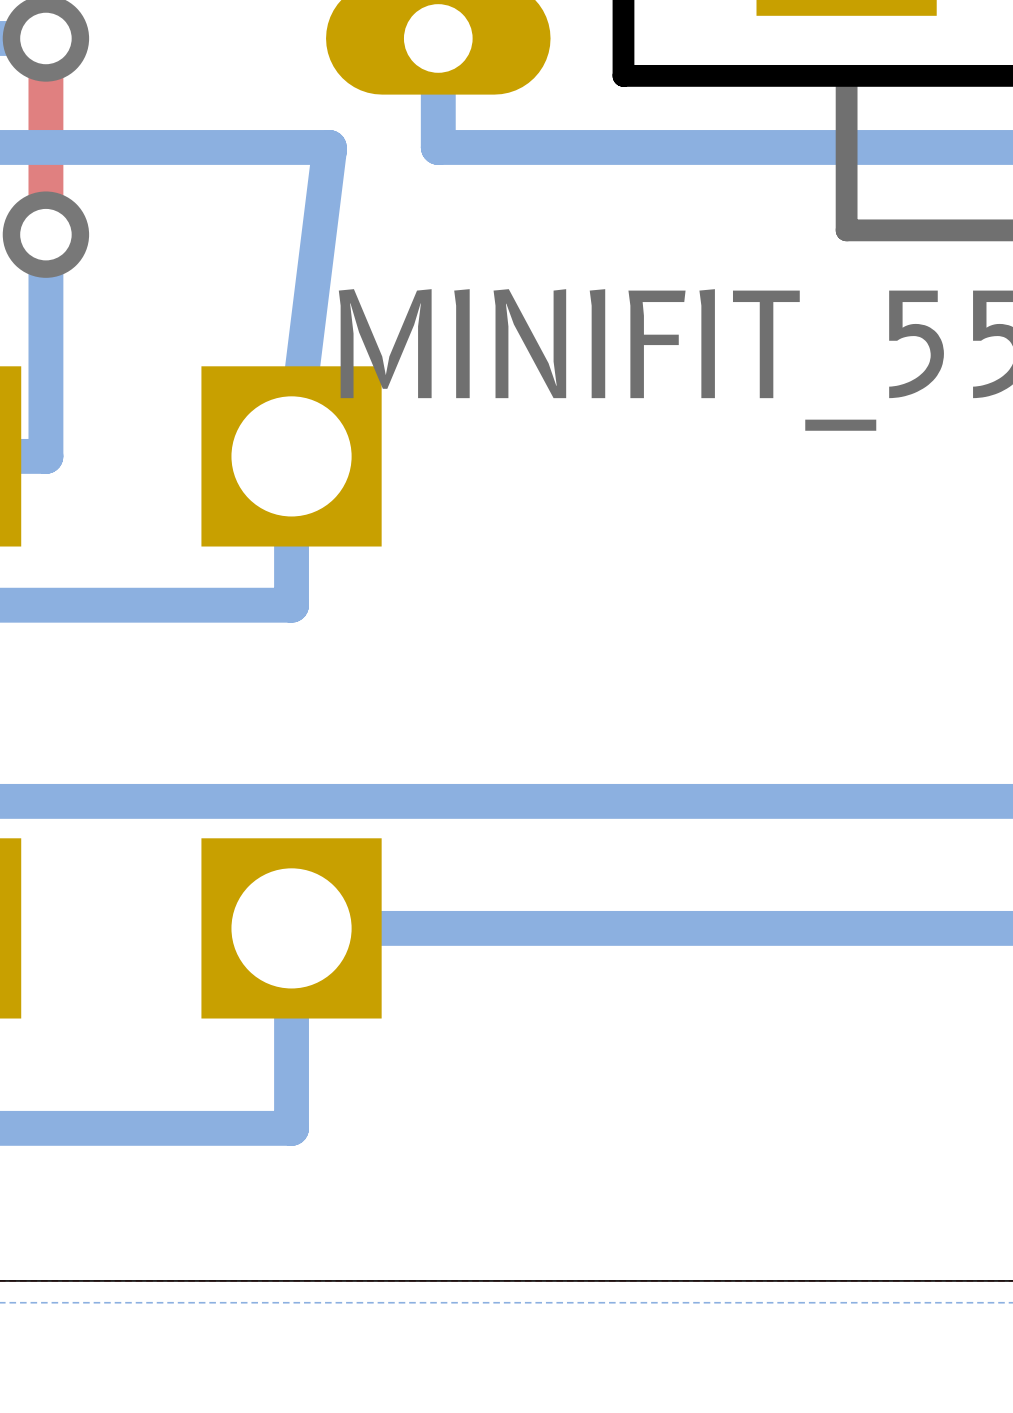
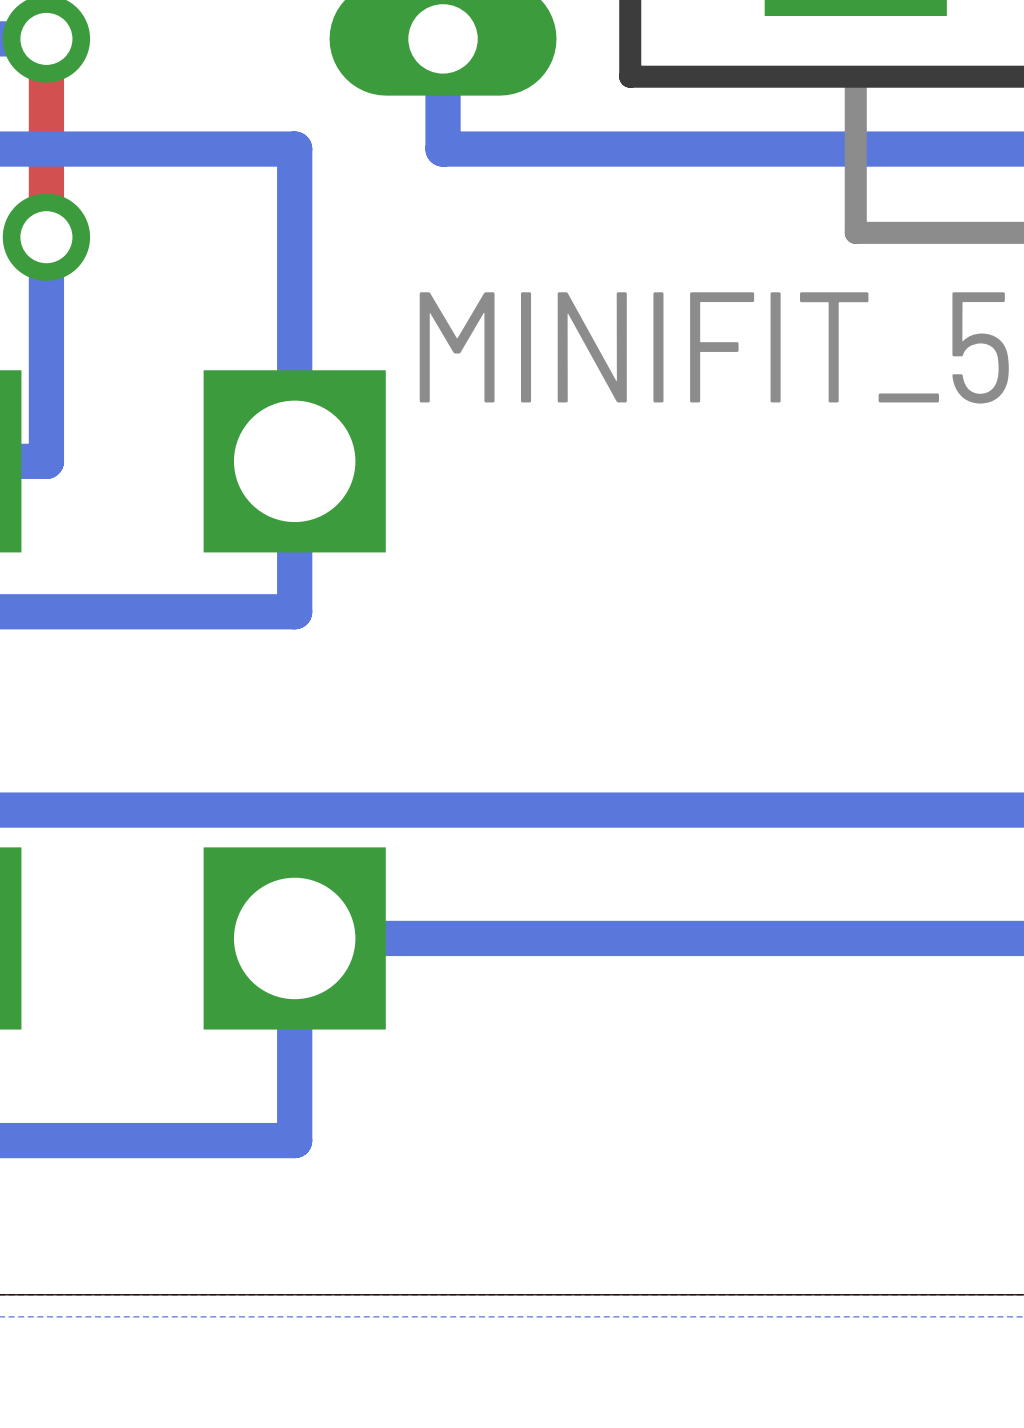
bottom track: (291, 147) (329, 147) (291, 456) -> (294, 149) (294, 461)

